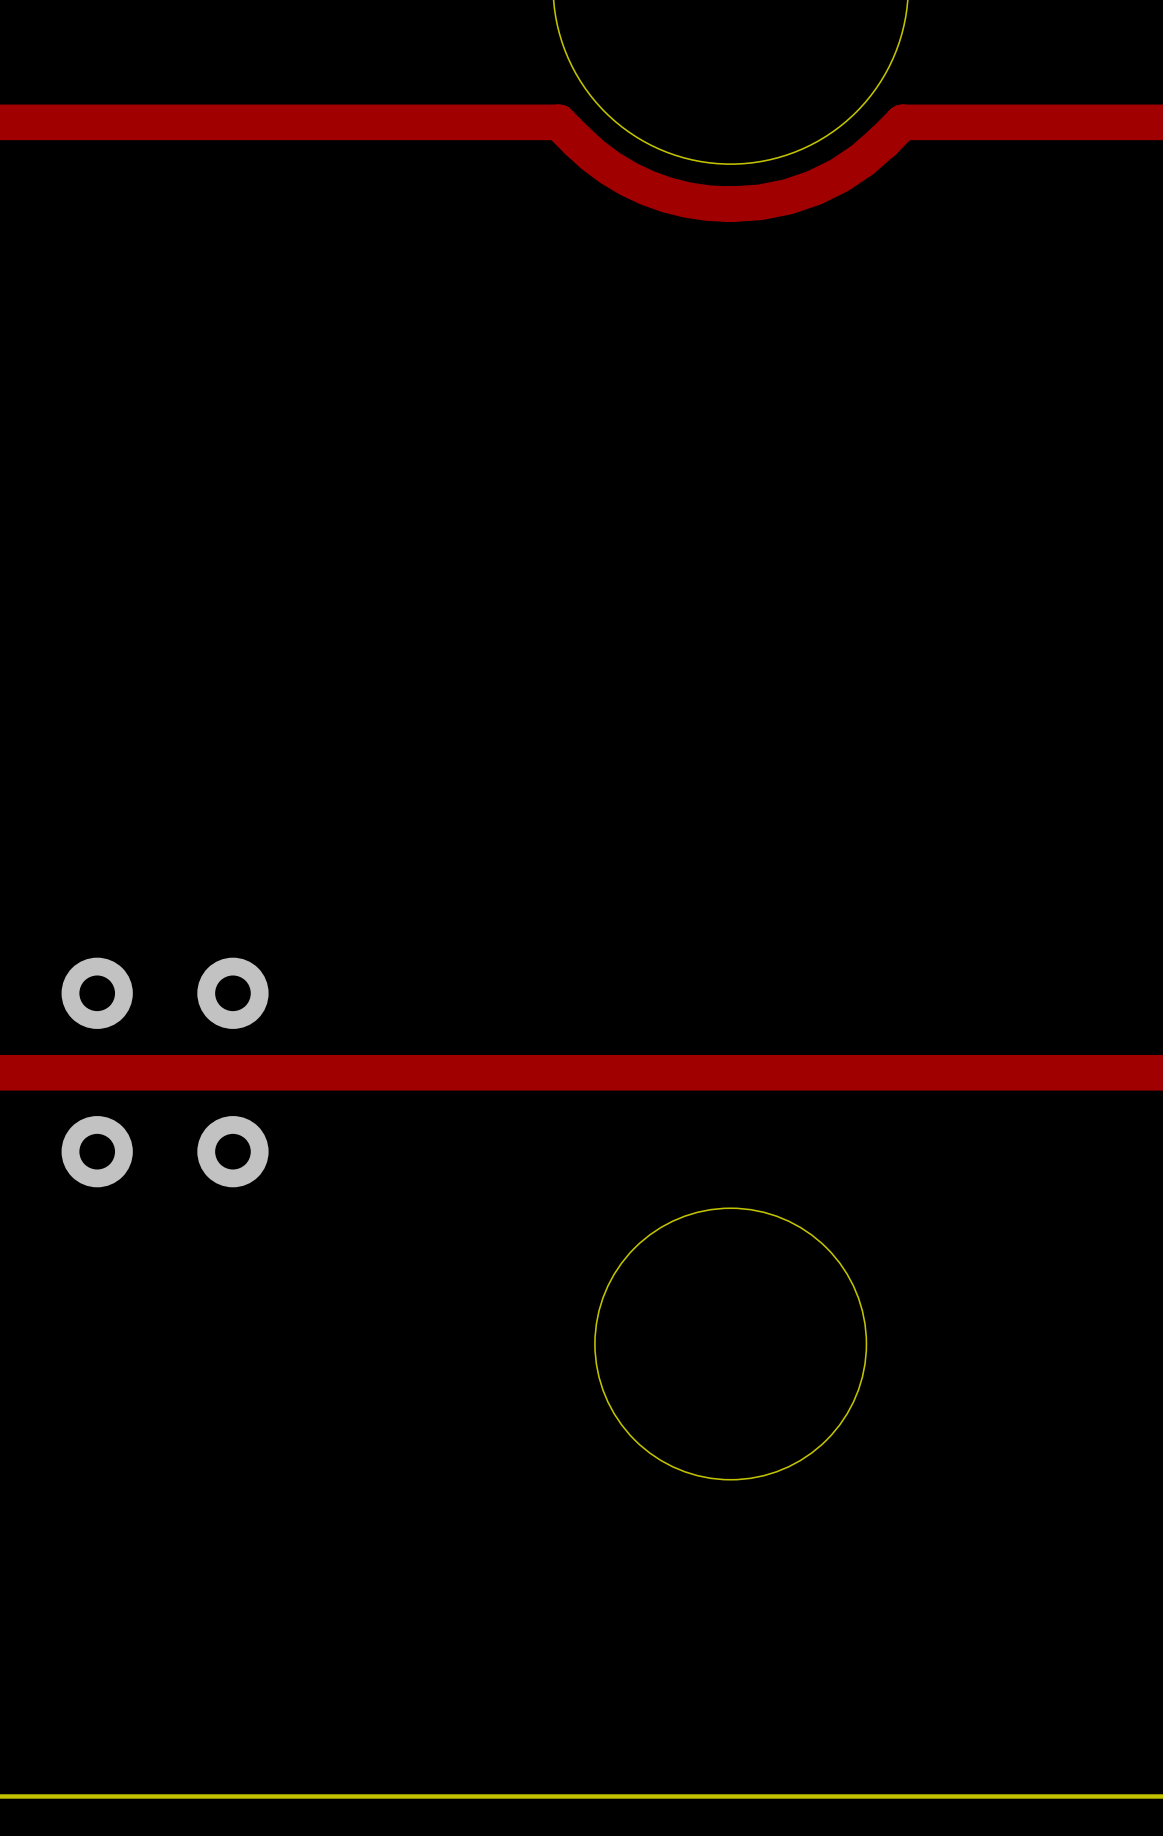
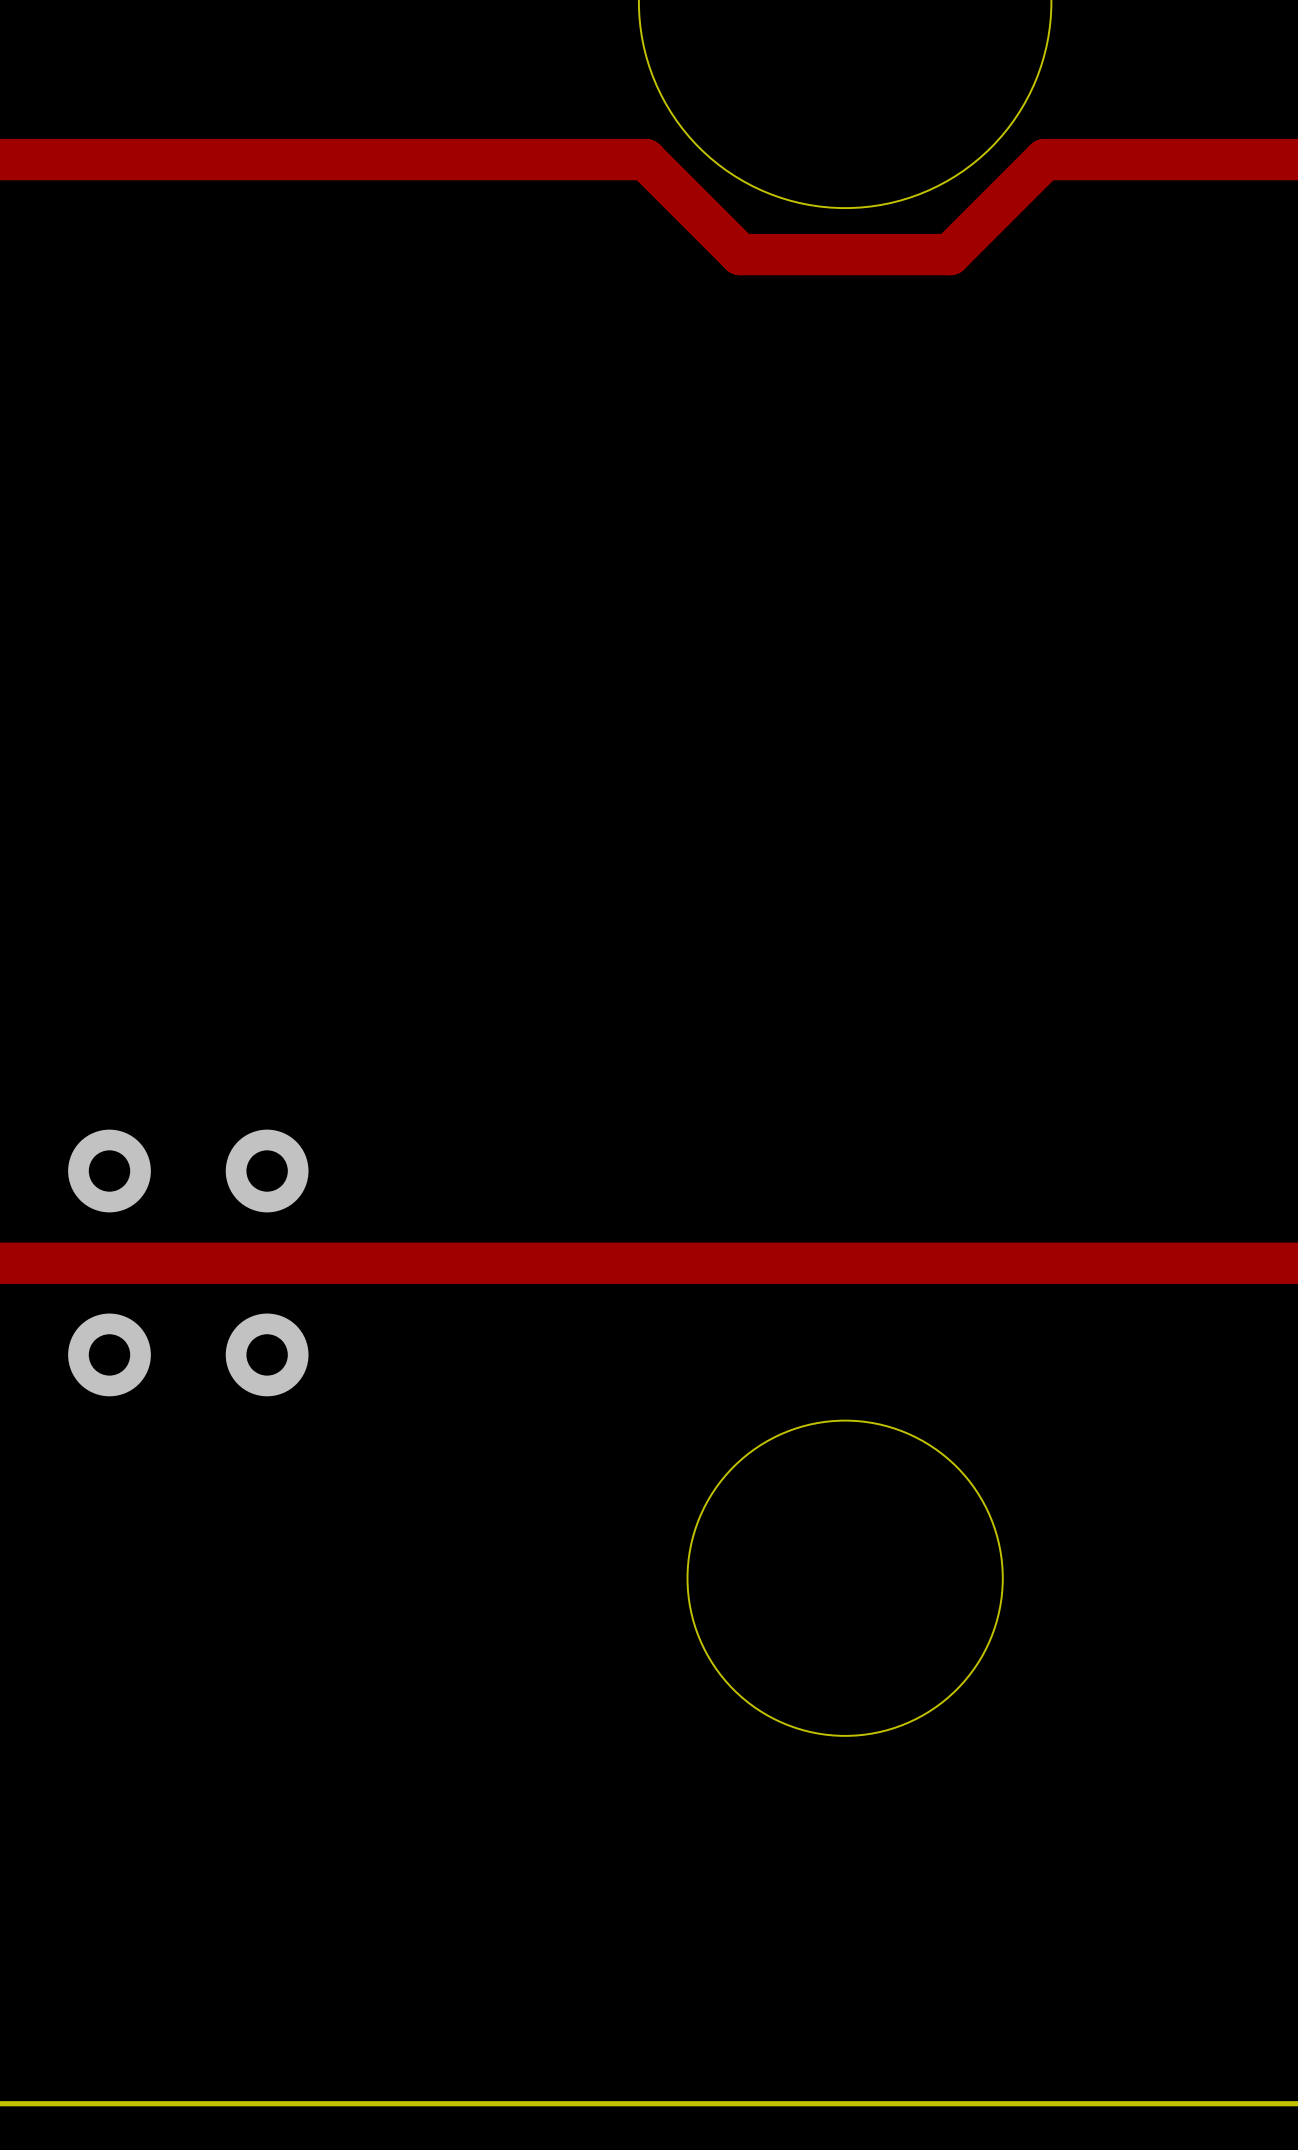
track: (577, 141) (610, 168) (647, 187) (687, 200) (729, 204) -> (667, 181) (740, 254) (843, 254)
track: (883, 141) (862, 159) (839, 175) (814, 187) (787, 196) (760, 202) (732, 204) -> (1022, 181) (949, 254) (847, 254)

